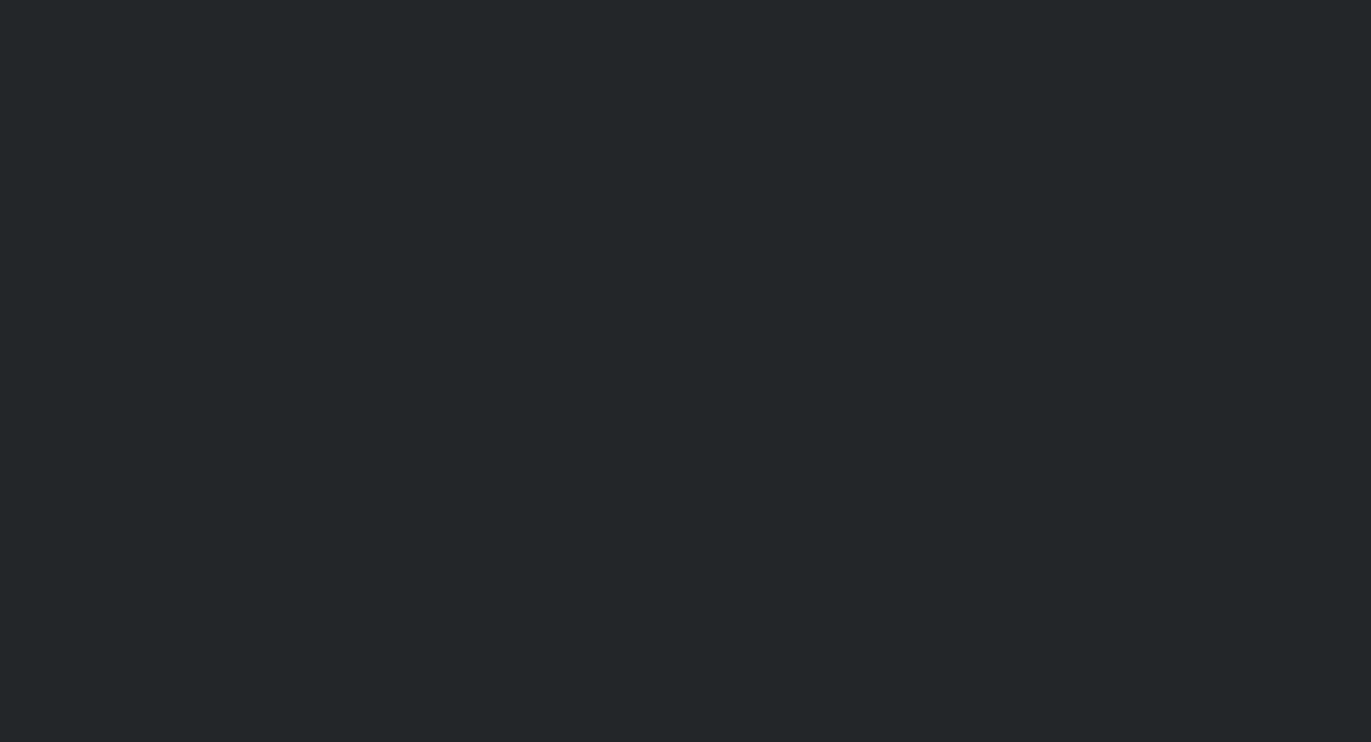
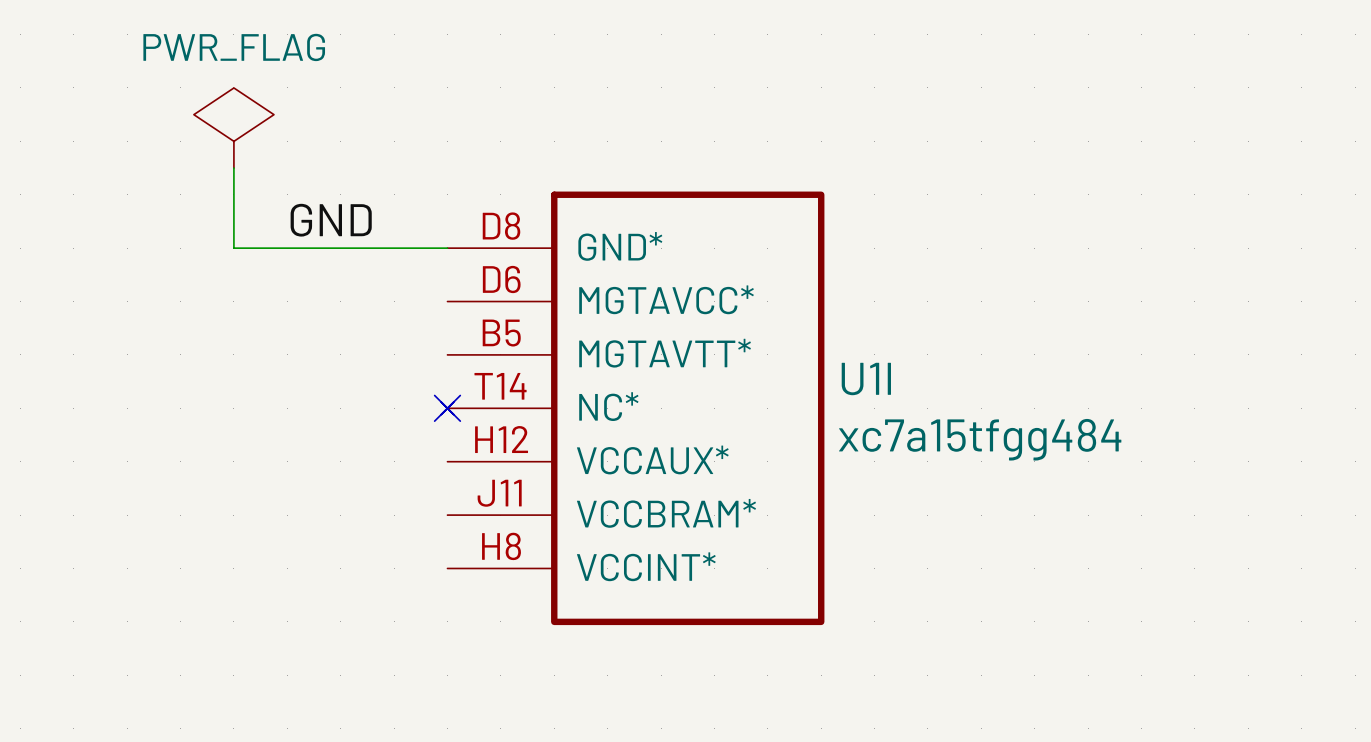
power symbol: none -> PWR_FLAG (233, 128)
wire: none -> (233, 168) (233, 248) (447, 248)
label: none -> GND (331, 220)
no-connect mark: none -> (447, 408)
U1I: none -> xc7a15tfgg484 (632, 408)

